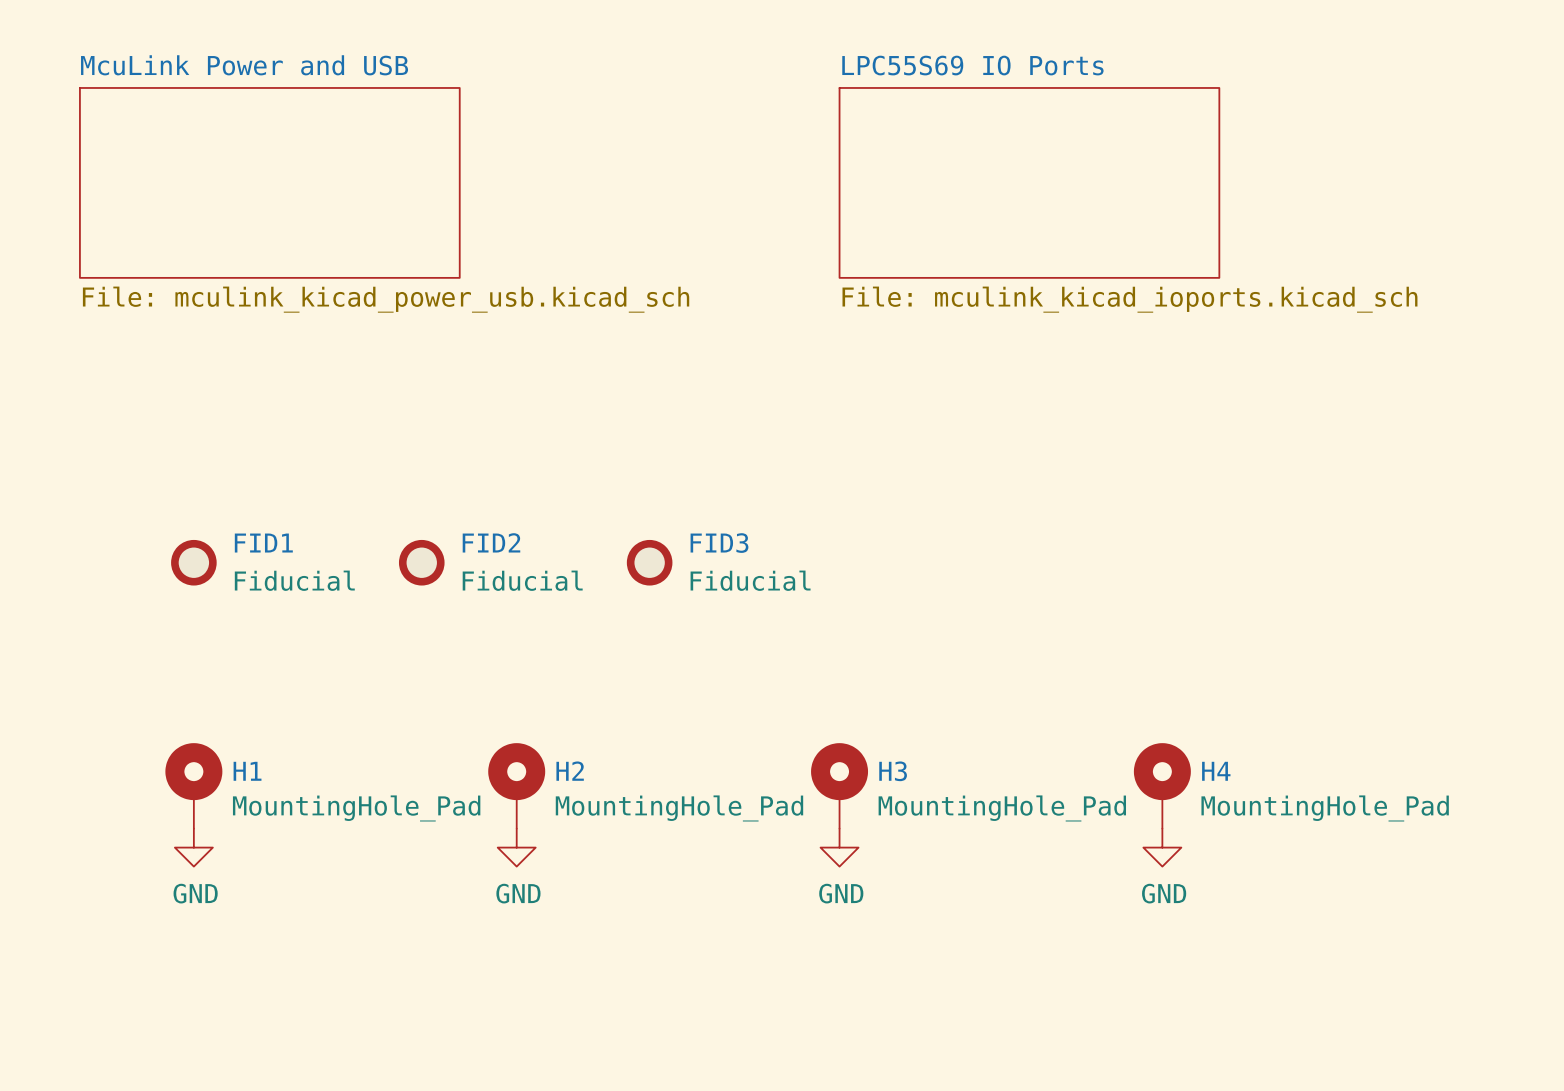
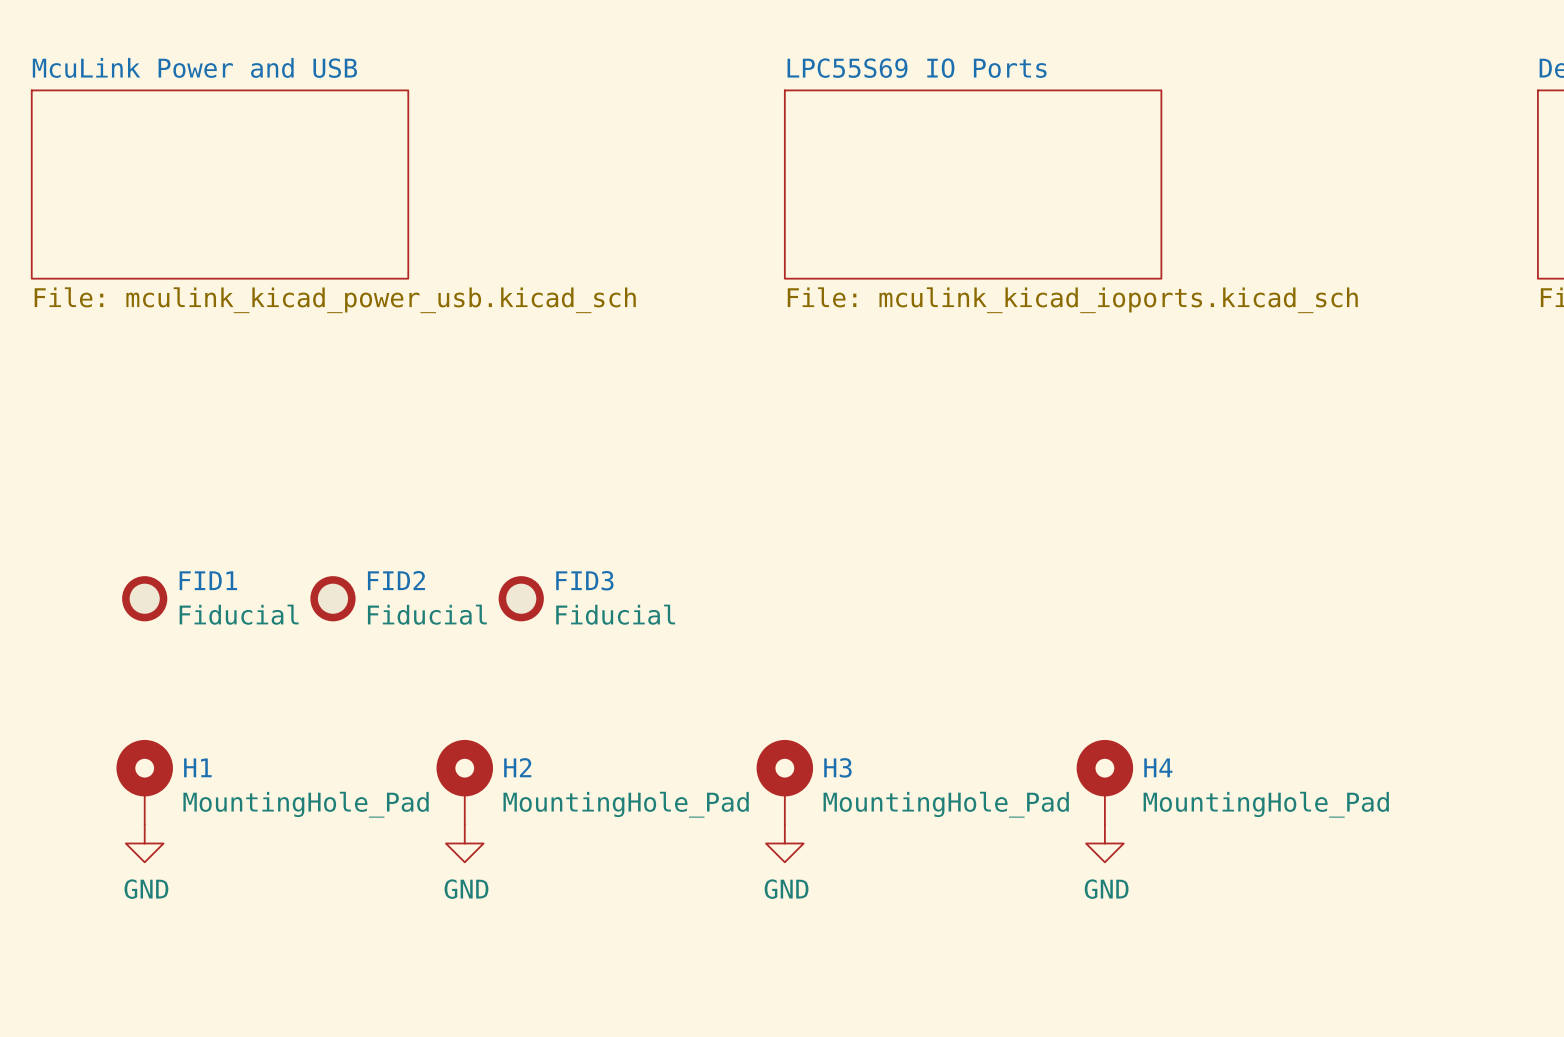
FID2 name position: FID2 (491, 542) -> FID2 (396, 580)
FID1 name position: FID1 (263, 543) -> FID1 (208, 580)
FID3 name position: FID3 (719, 543) -> FID3 (584, 580)
FID1 position: (193, 562) -> (144, 598)
FID2 position: (421, 562) -> (332, 598)
FID3 position: (649, 562) -> (521, 598)
FID1 value position: Fiducial (294, 580) -> Fiducial (239, 614)
FID2 value position: Fiducial (522, 580) -> Fiducial (427, 614)
FID3 value position: Fiducial (750, 580) -> Fiducial (615, 614)

